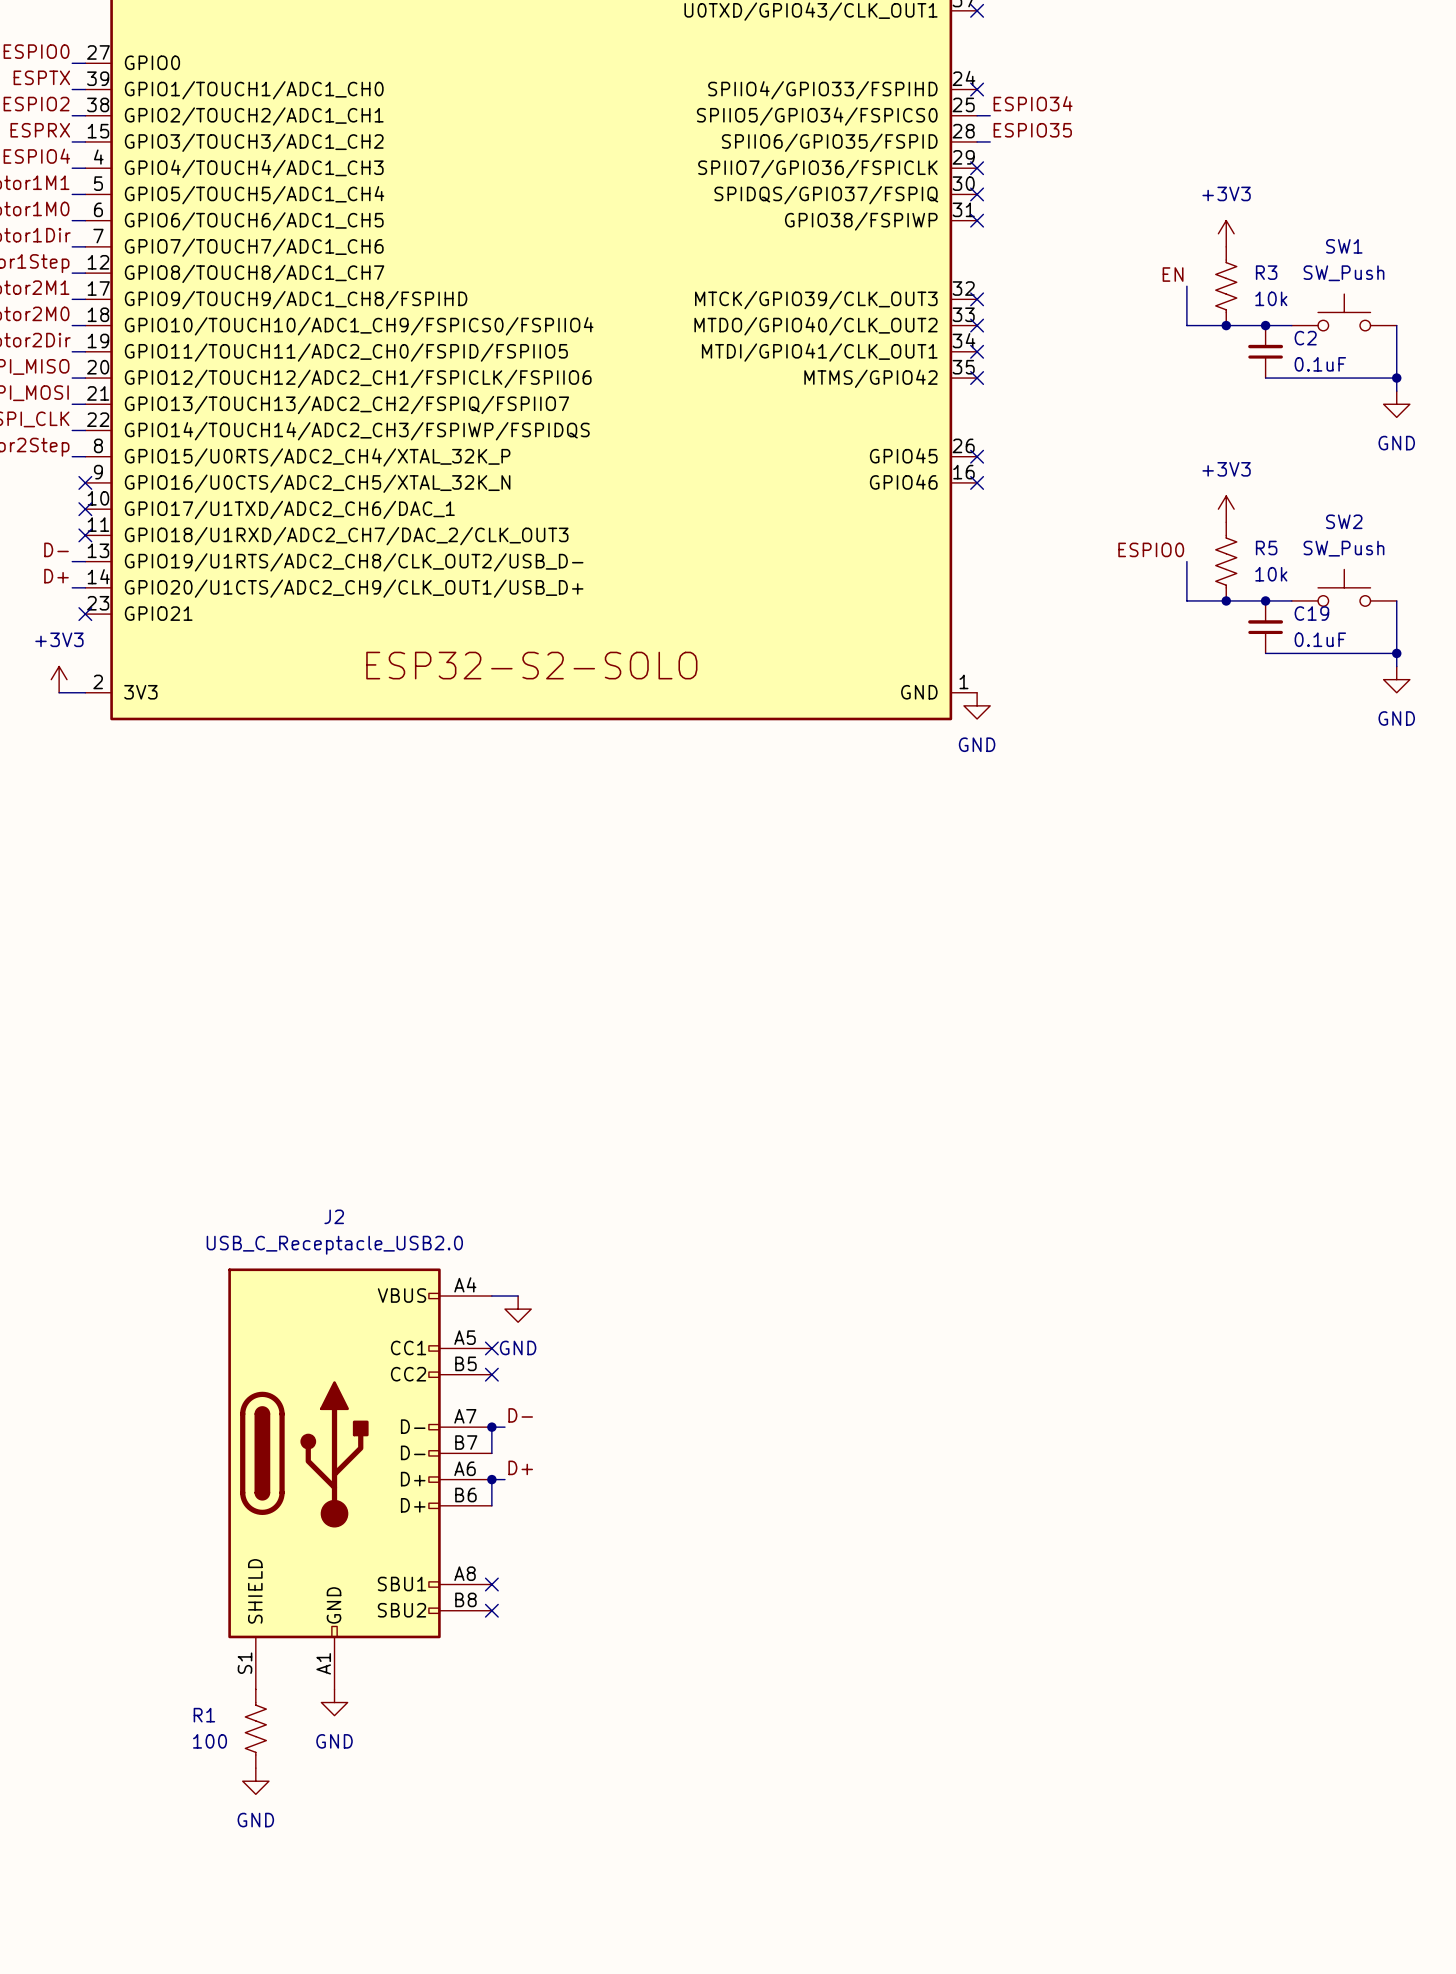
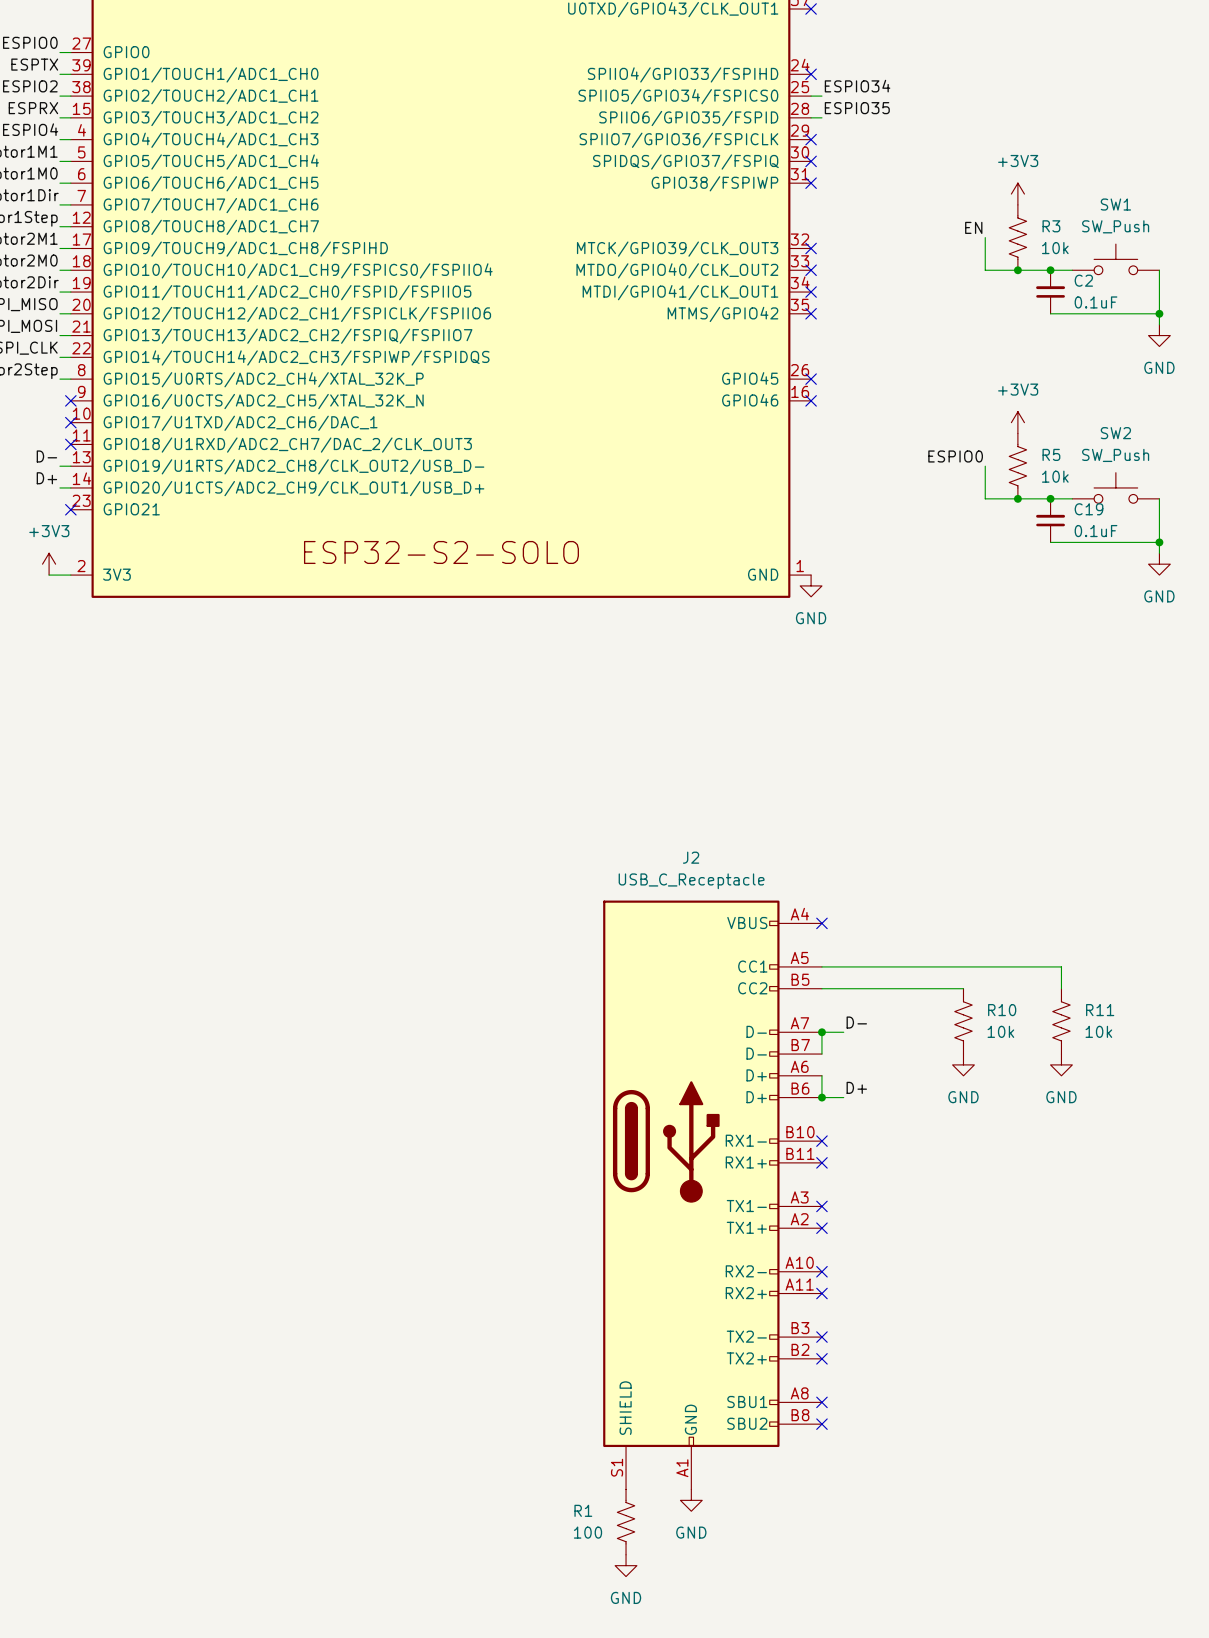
no-connect mark: none -> (821, 923)
wire: none -> (821, 966) (1061, 966) (1061, 988)
wire: none -> (821, 988) (963, 988)
J2 name position: J2 (334, 1216) -> J2 (691, 857)
R10: none -> 10k (963, 1021)
R11: none -> 10k (1061, 1021)
label: none -> D- (856, 1022)
junction: none -> (821, 1032)
wire: none -> (843, 1032) (821, 1032) (821, 1054)
J2 value: USB_C_Receptacle_USB2.0 (334, 1245) -> USB_C_Receptacle (691, 881)
J2 symbol: [228, 1268, 492, 1690] -> [603, 900, 822, 1490]
power symbol: none -> GND (963, 1064)
power symbol: none -> GND (1061, 1064)
wire: (491, 1296) (518, 1296) -> none
wire: none -> (821, 1075) (821, 1097) (843, 1097)
power symbol: GND (518, 1309) -> none
label: none -> D+ (856, 1087)
junction: none -> (821, 1097)
no-connect mark: (491, 1348) -> none
no-connect mark: (491, 1374) -> none
no-connect mark: none -> (821, 1141)
no-connect mark: none -> (821, 1162)
label: D- (520, 1415) -> none
junction: (491, 1427) -> none
wire: (504, 1427) (491, 1427) (491, 1453) -> none
no-connect mark: none -> (821, 1206)
label: D+ (520, 1467) -> none
junction: (491, 1479) -> none
wire: (504, 1479) (491, 1479) (491, 1505) -> none
no-connect mark: none -> (821, 1228)
no-connect mark: none -> (821, 1271)
no-connect mark: none -> (821, 1293)
no-connect mark: (491, 1584) -> none
no-connect mark: (491, 1610) -> none
no-connect mark: none -> (821, 1337)
no-connect mark: none -> (821, 1358)
no-connect mark: none -> (821, 1402)
power symbol: GND (334, 1702) -> none
no-connect mark: none -> (821, 1424)
R1 position: (255, 1728) -> (626, 1522)
power symbol: GND (255, 1781) -> none
power symbol: none -> GND (691, 1500)
power symbol: none -> GND (626, 1565)

